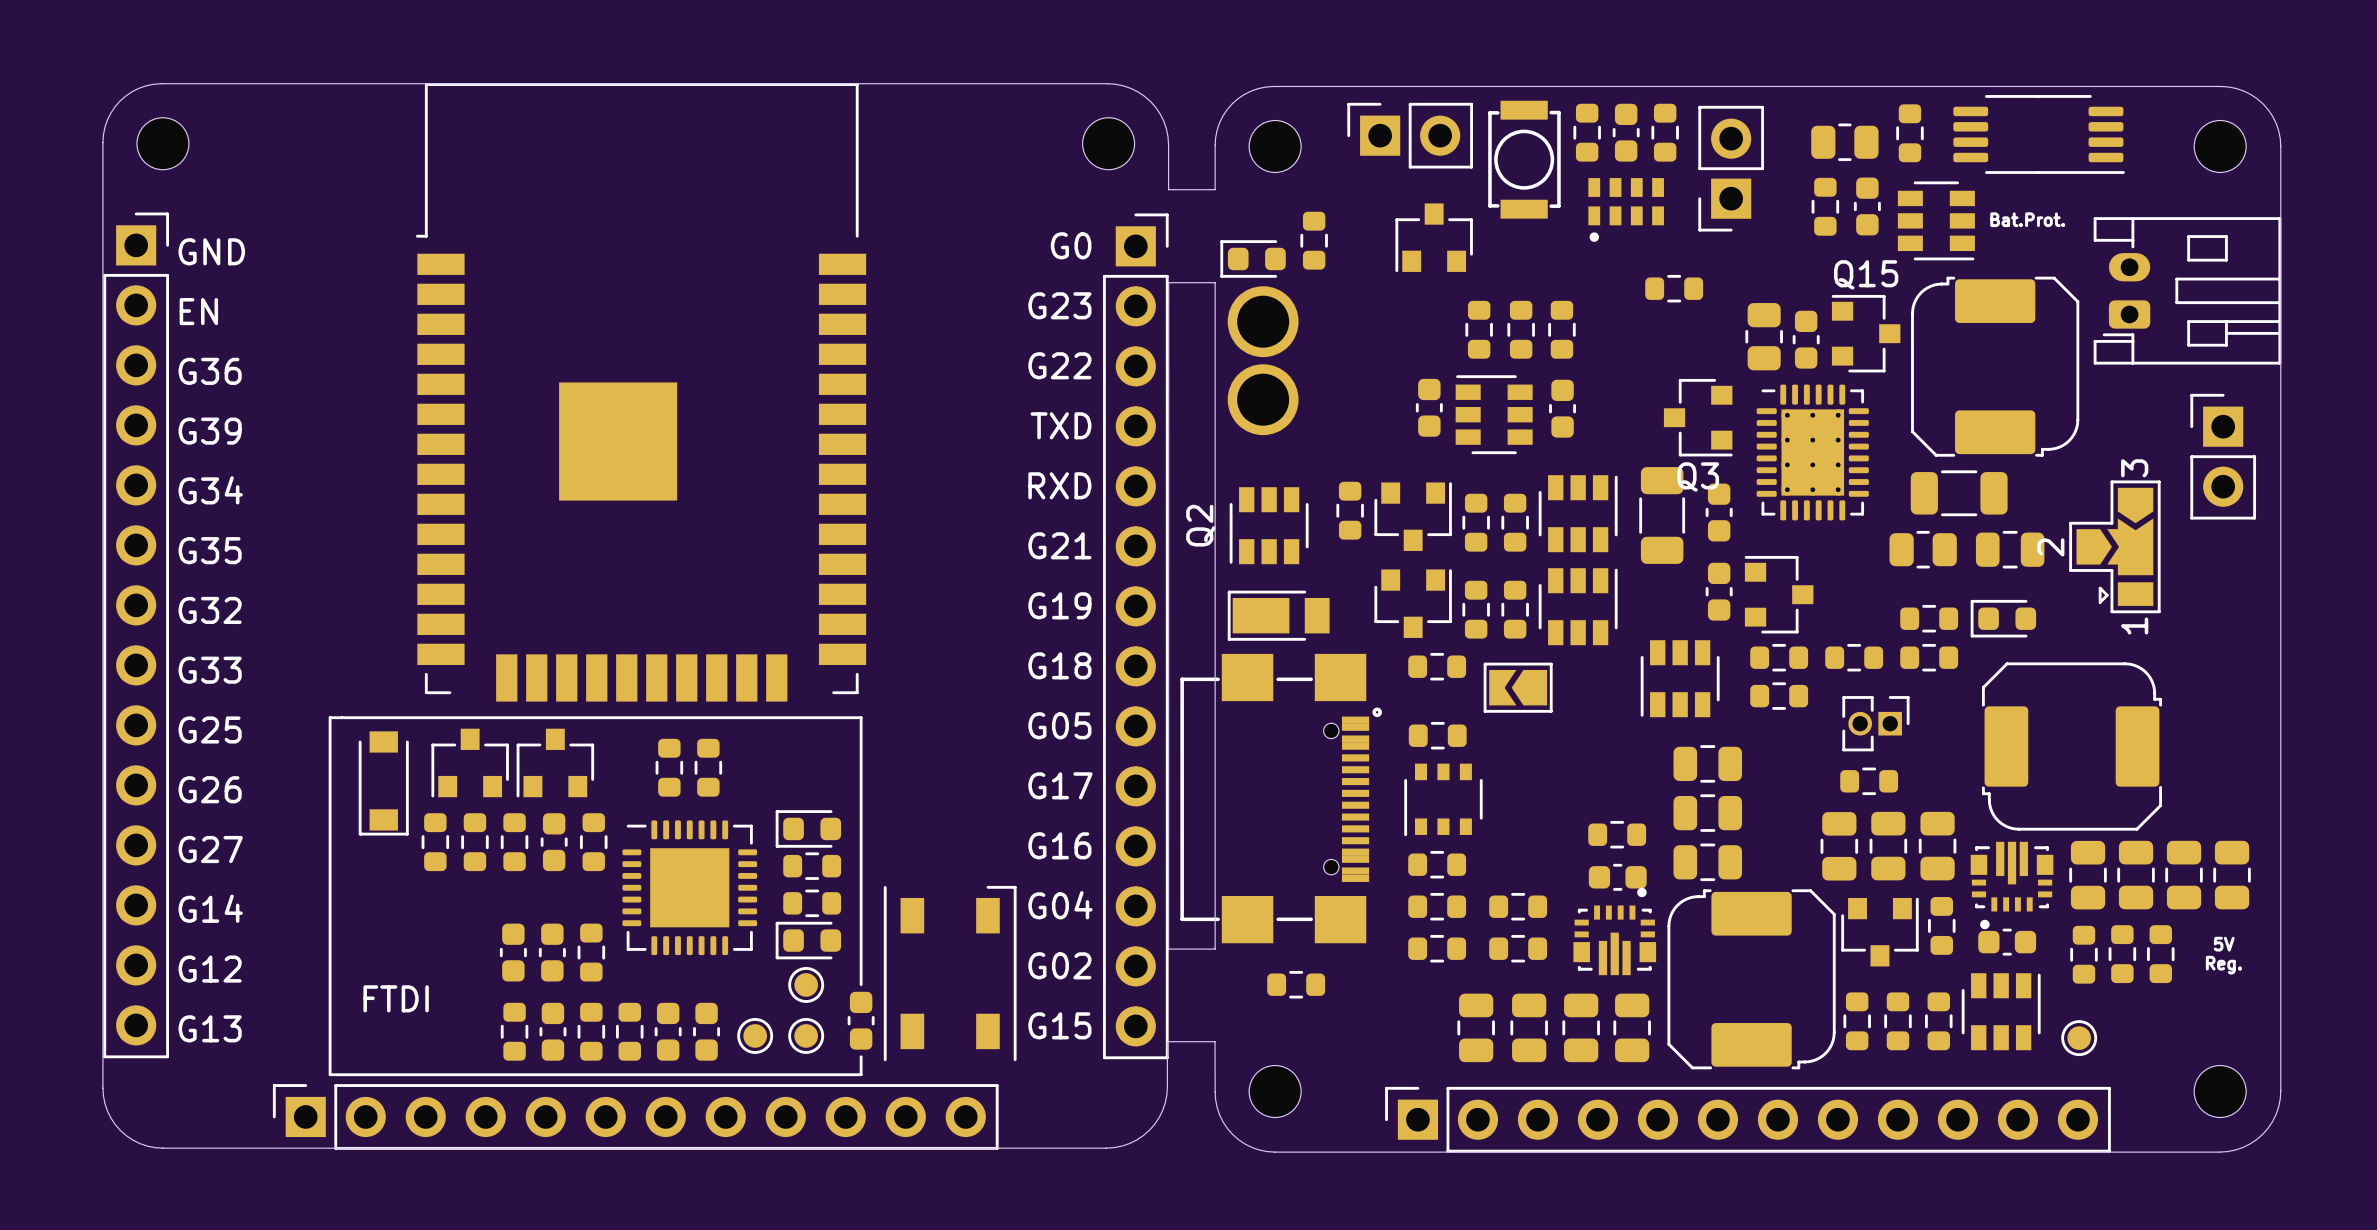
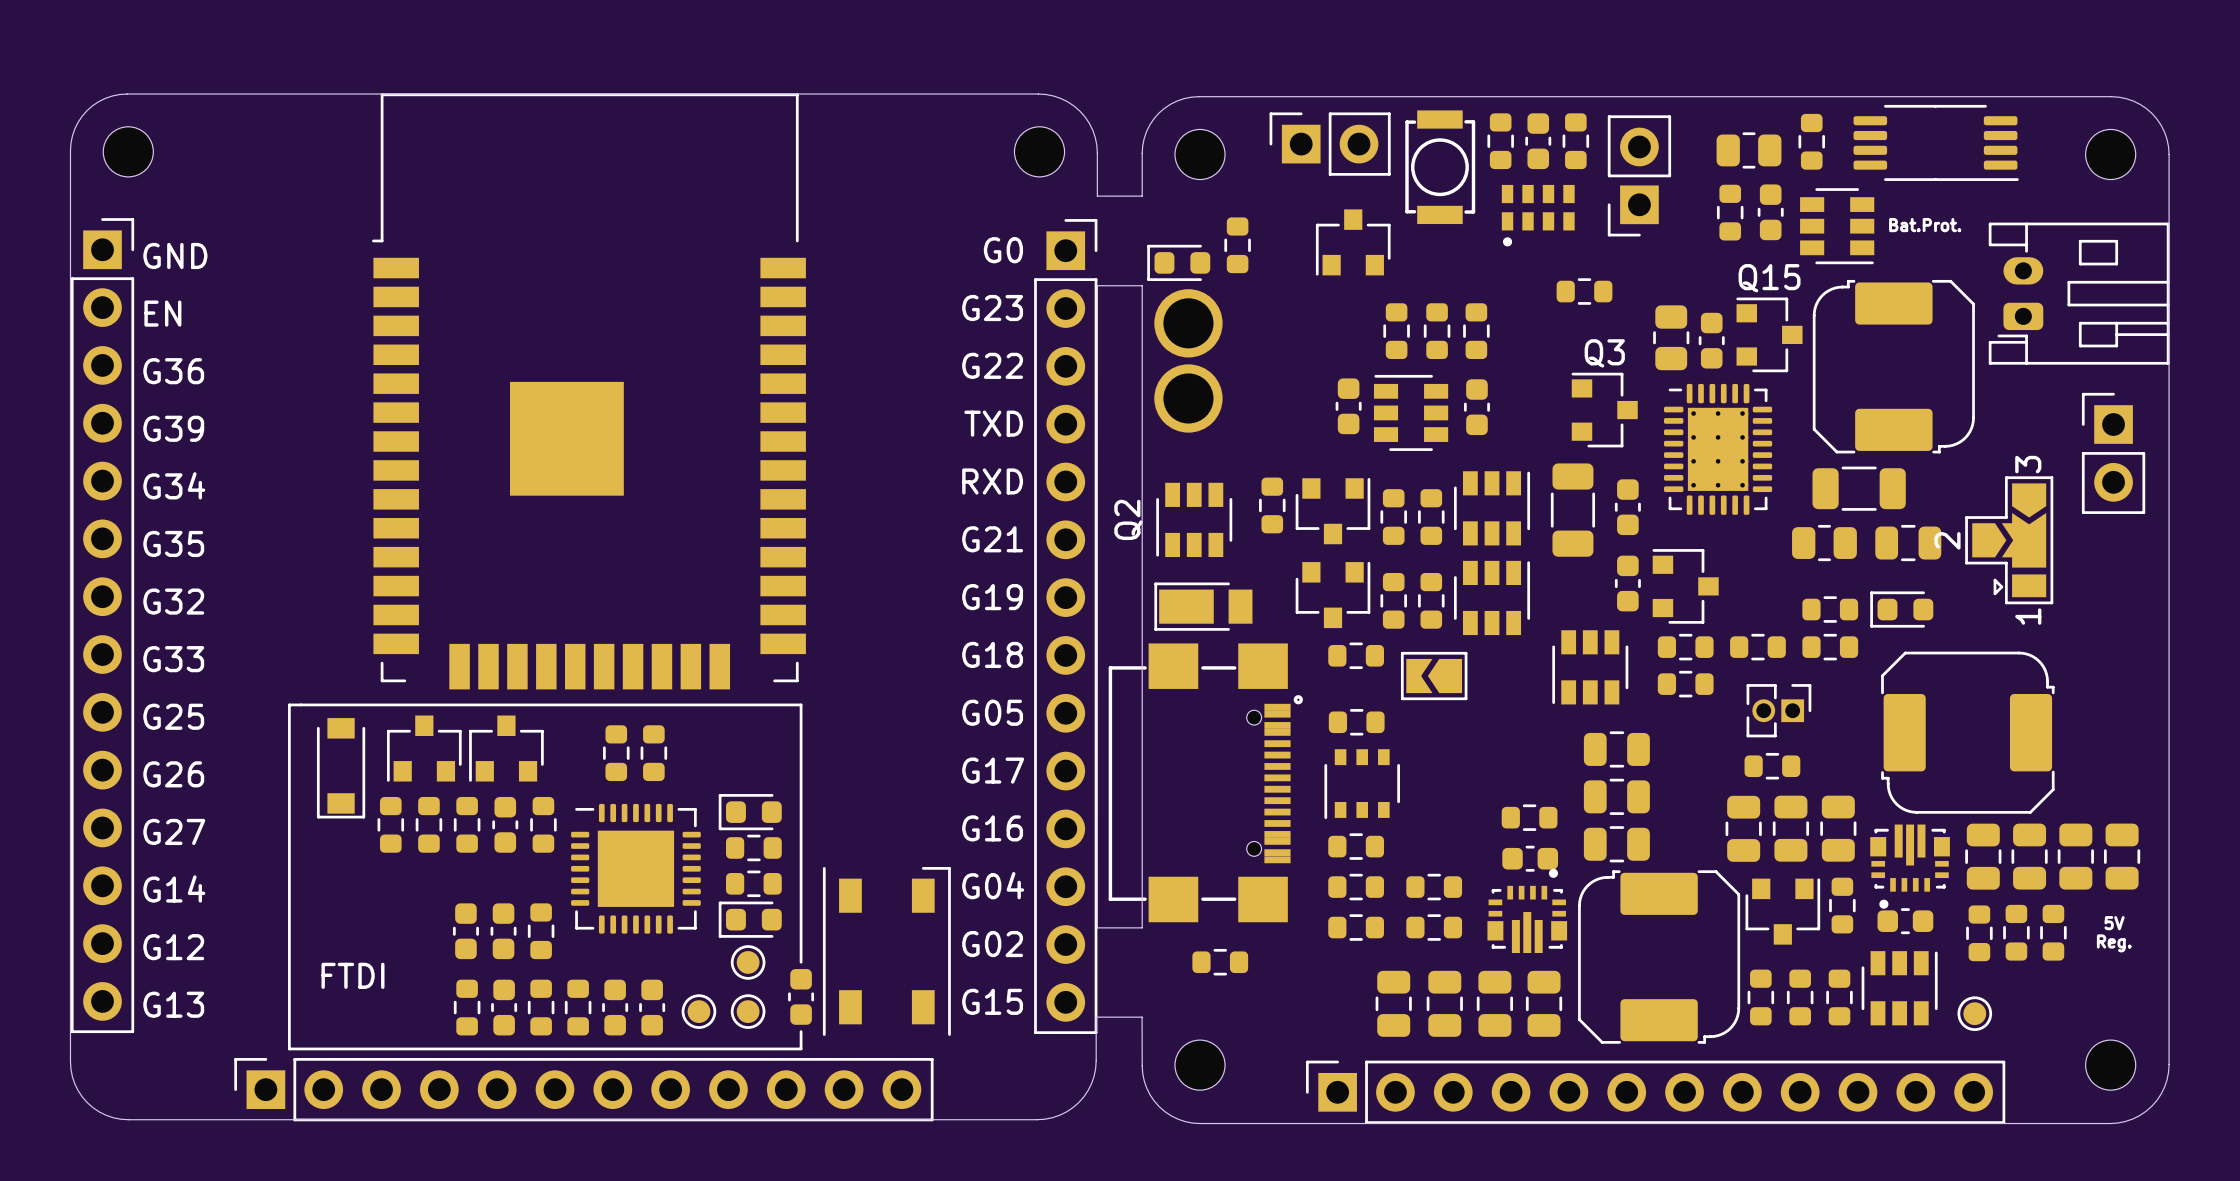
Q3 rotation: 0° (1698, 417) -> 180° (1604, 410)

